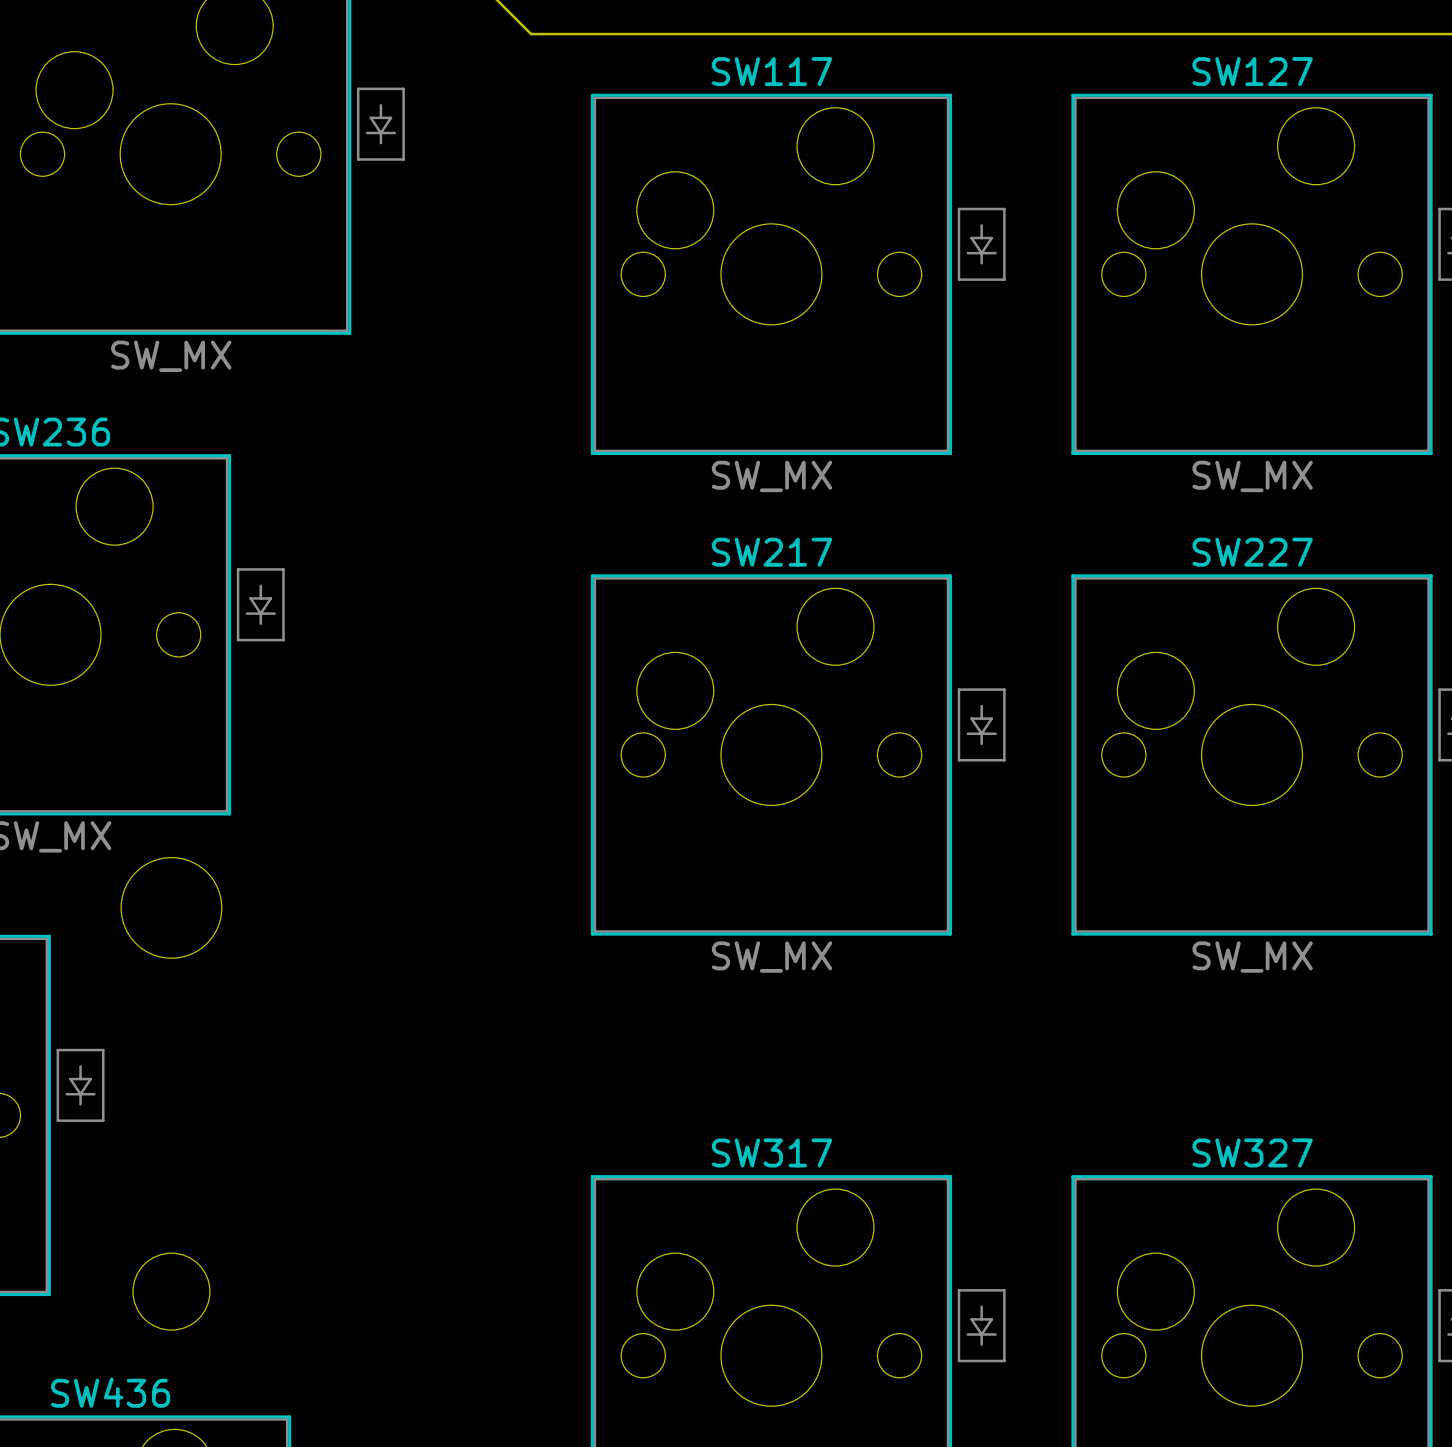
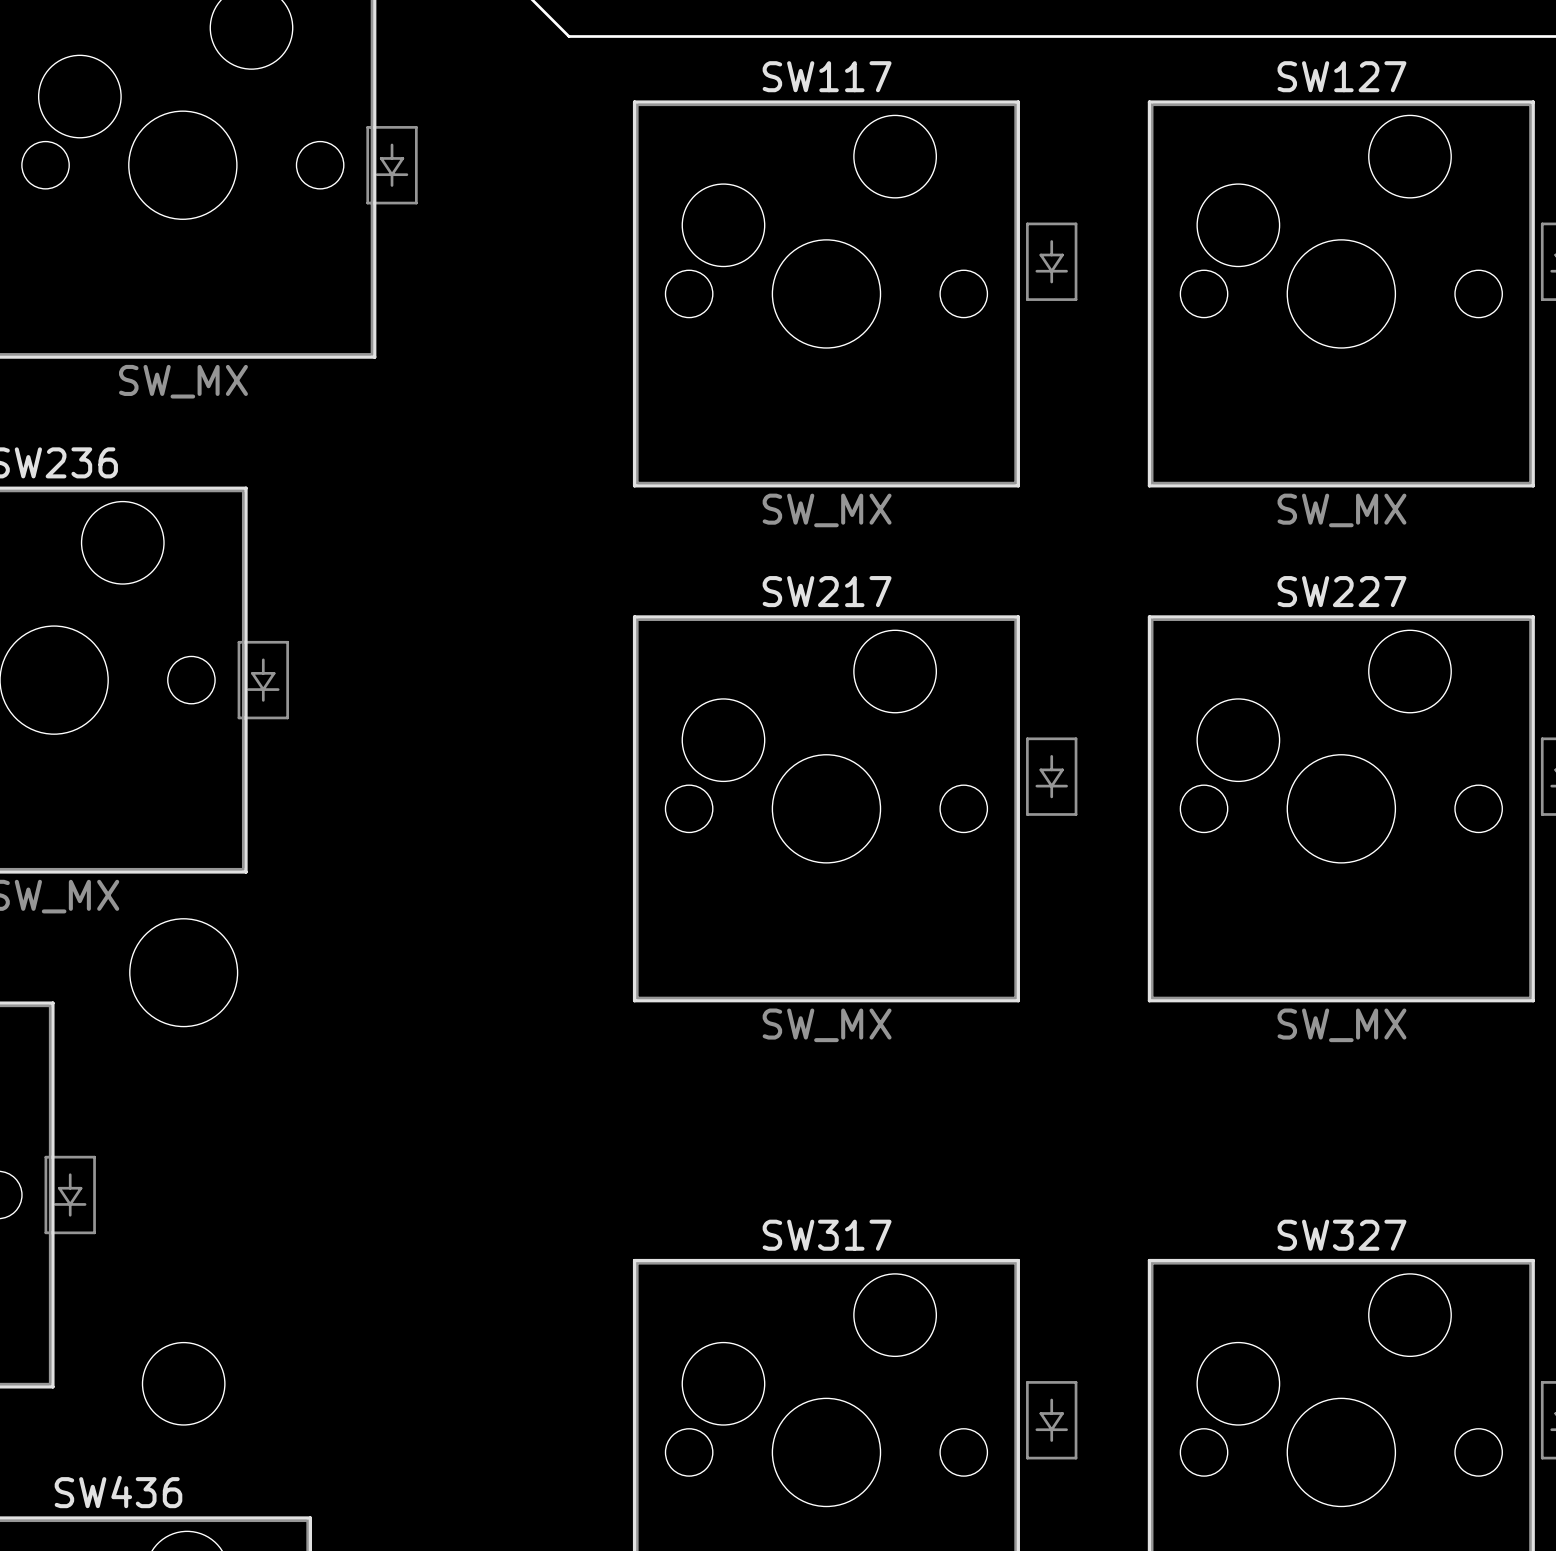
part position: (380, 124) -> (392, 165)
part position: (260, 604) -> (263, 680)
part position: (80, 1085) -> (70, 1194)

